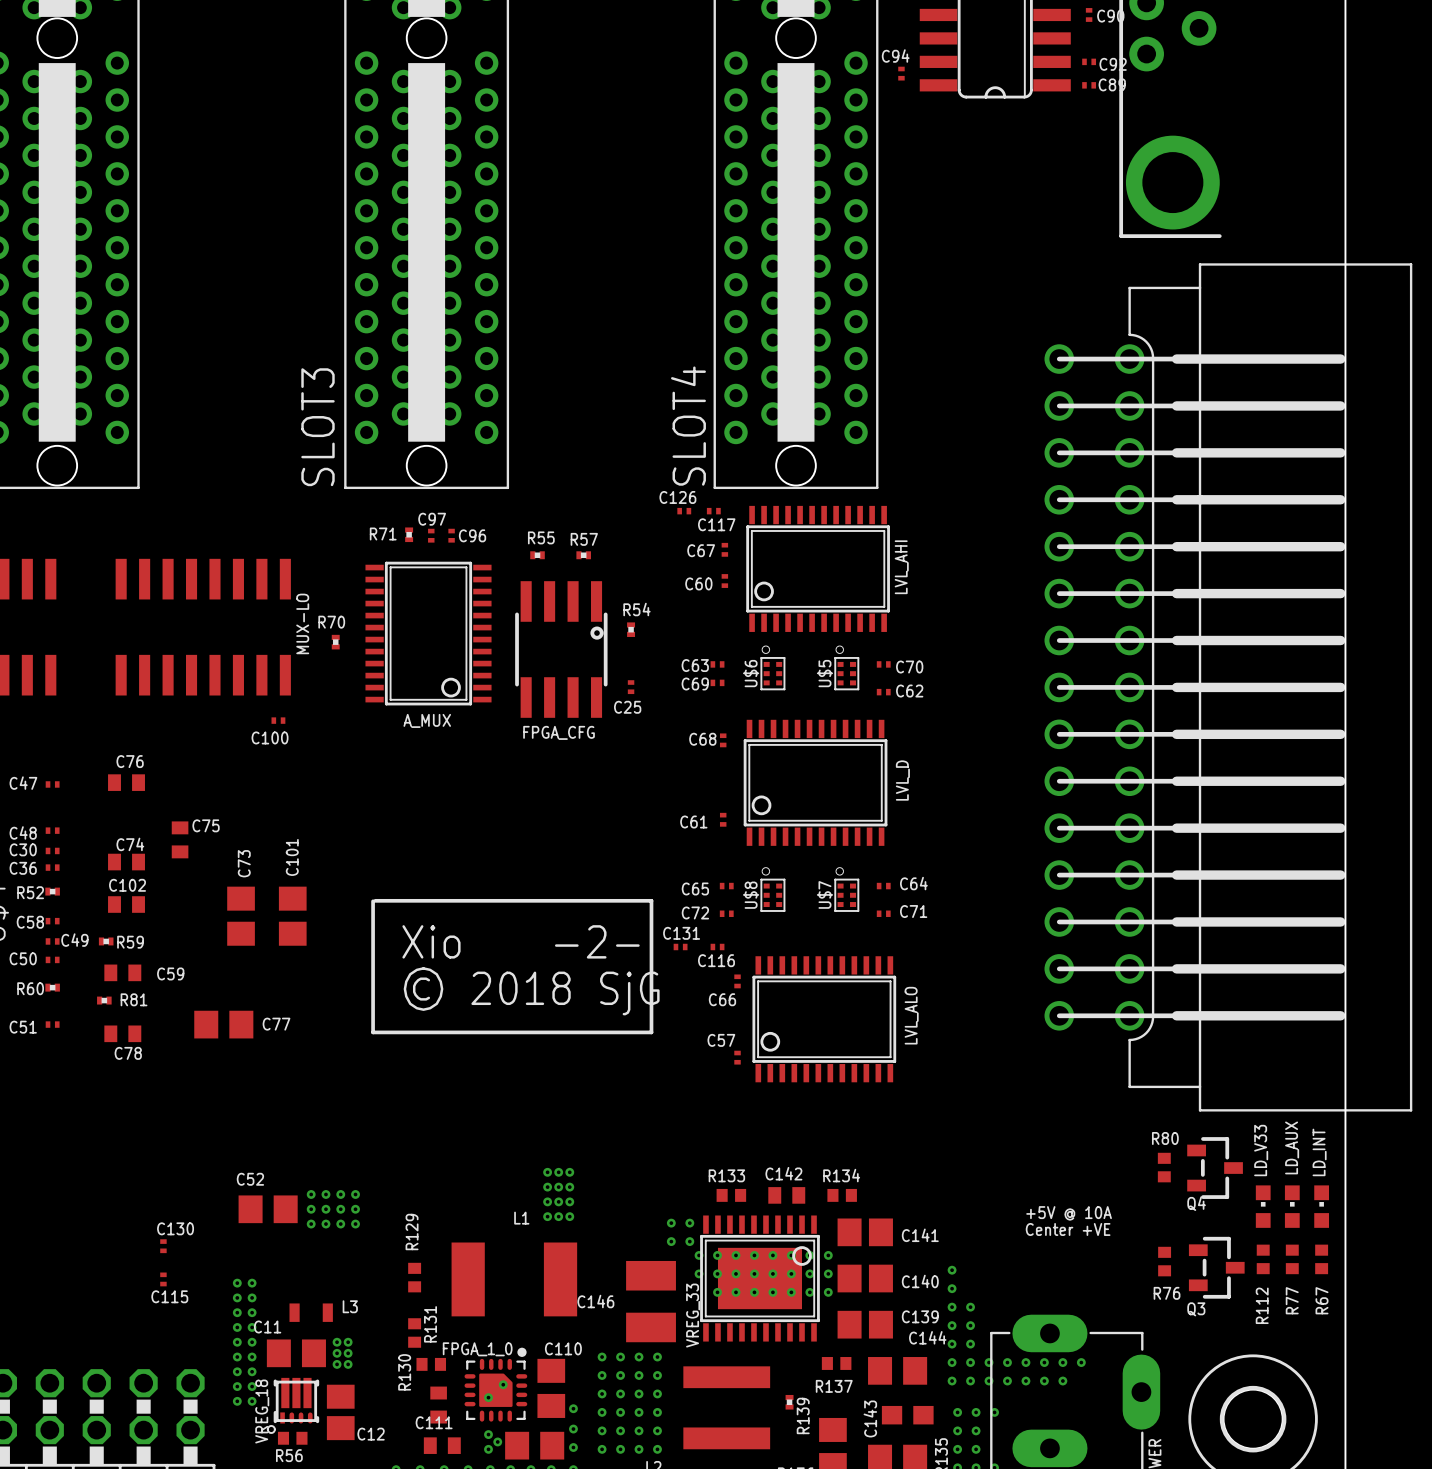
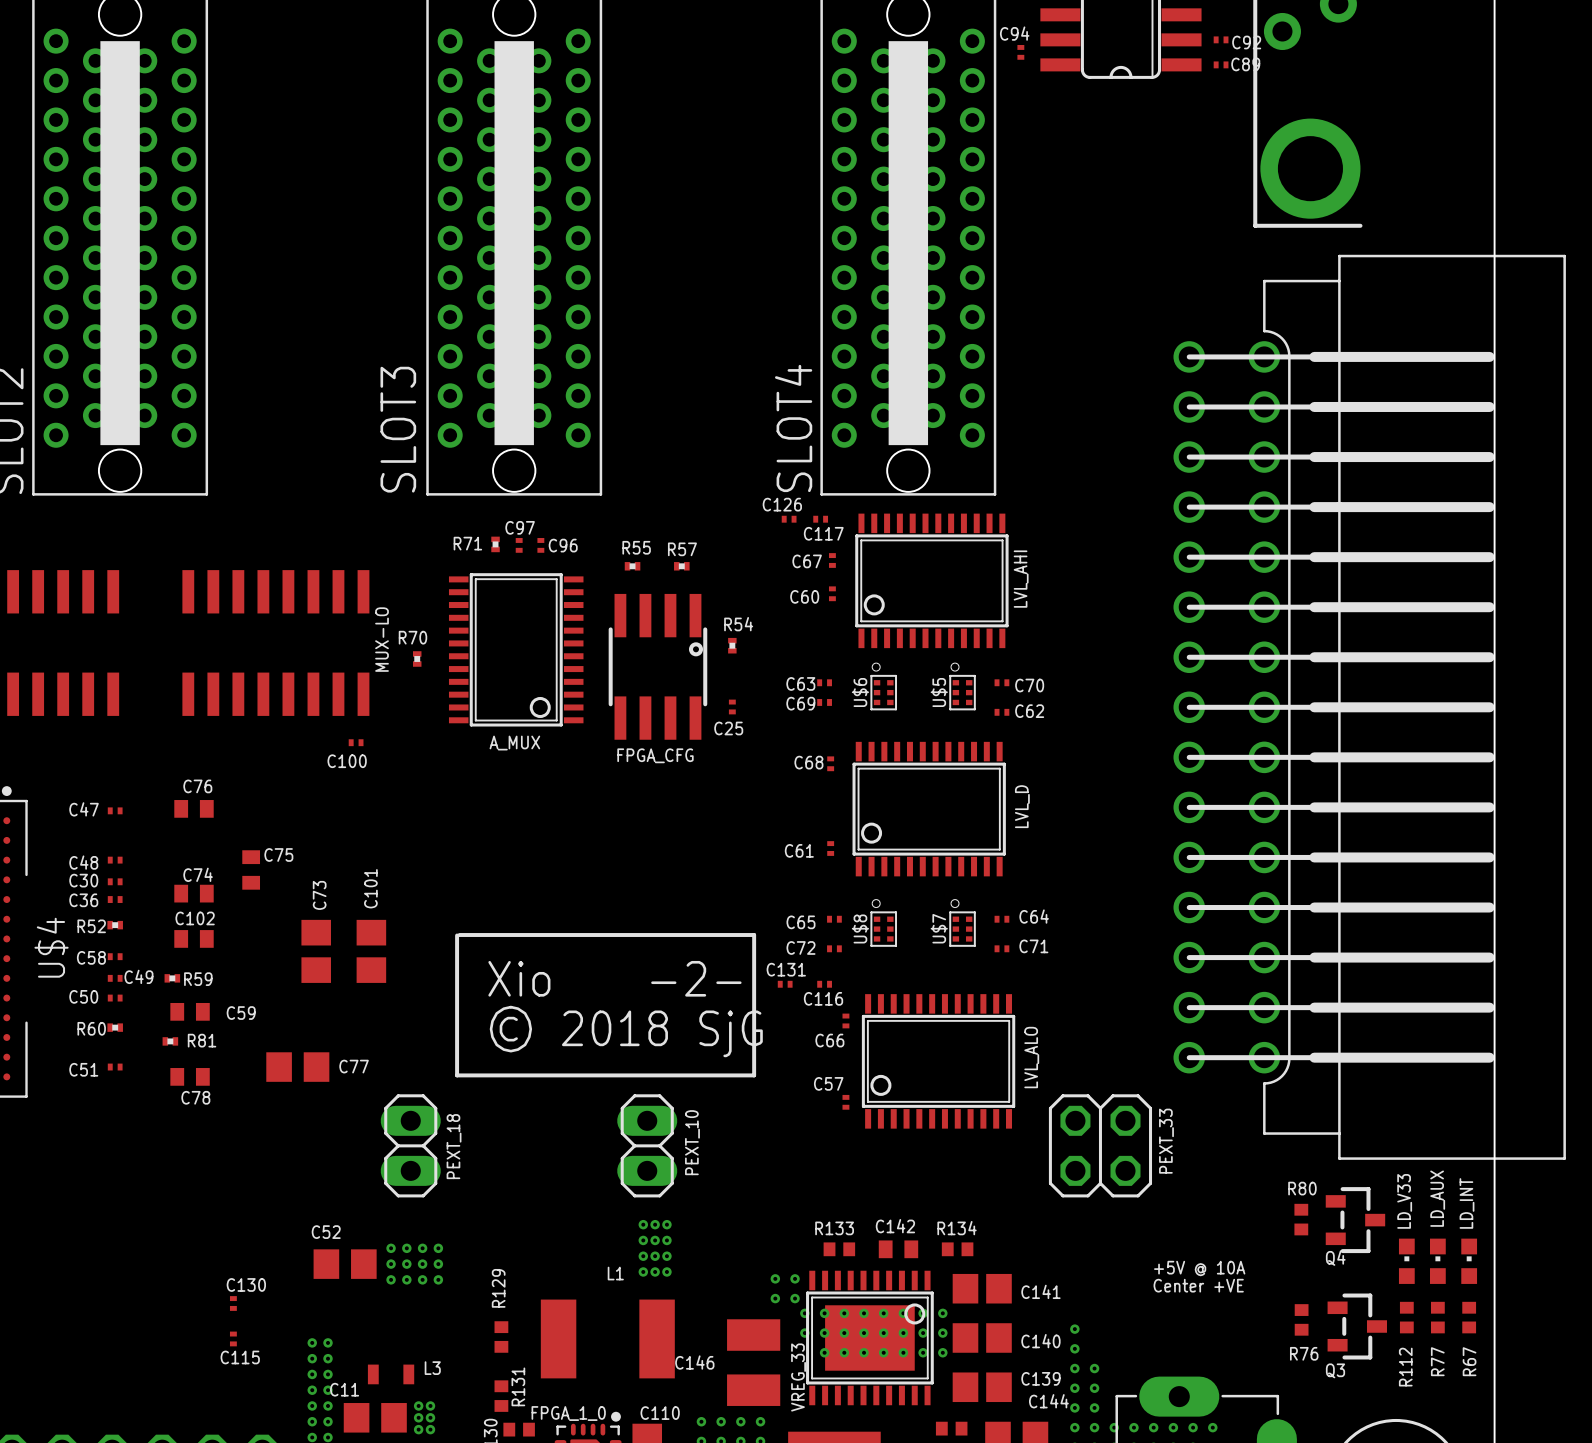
PEXT_18: none -> (410, 1145)
PEXT_10: none -> (647, 1145)
PEXT_33: none -> (1100, 1145)

